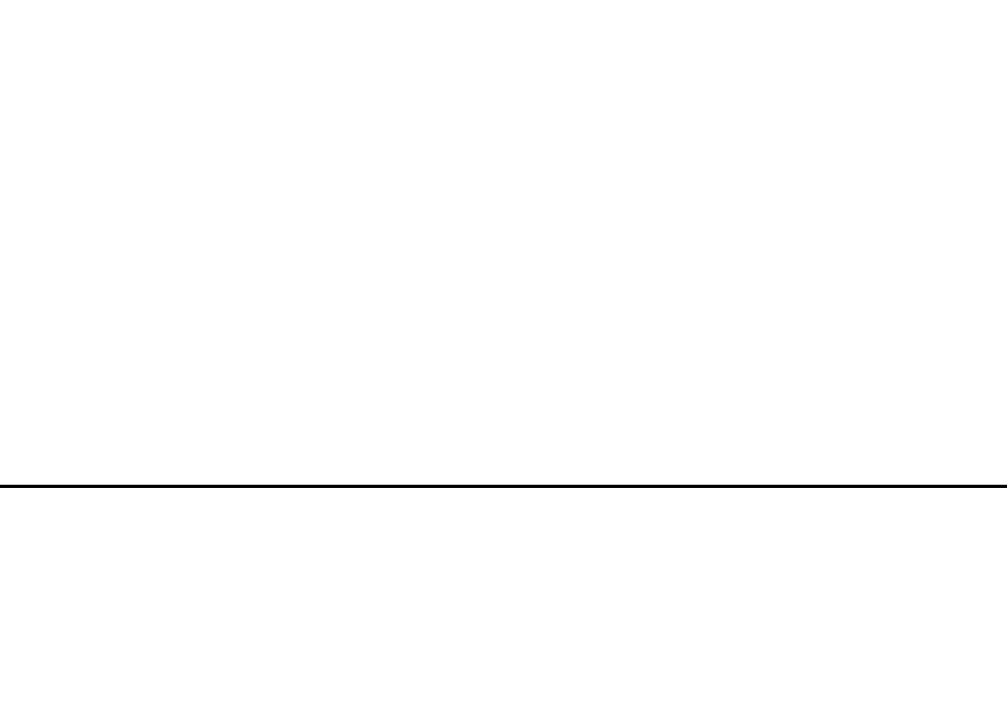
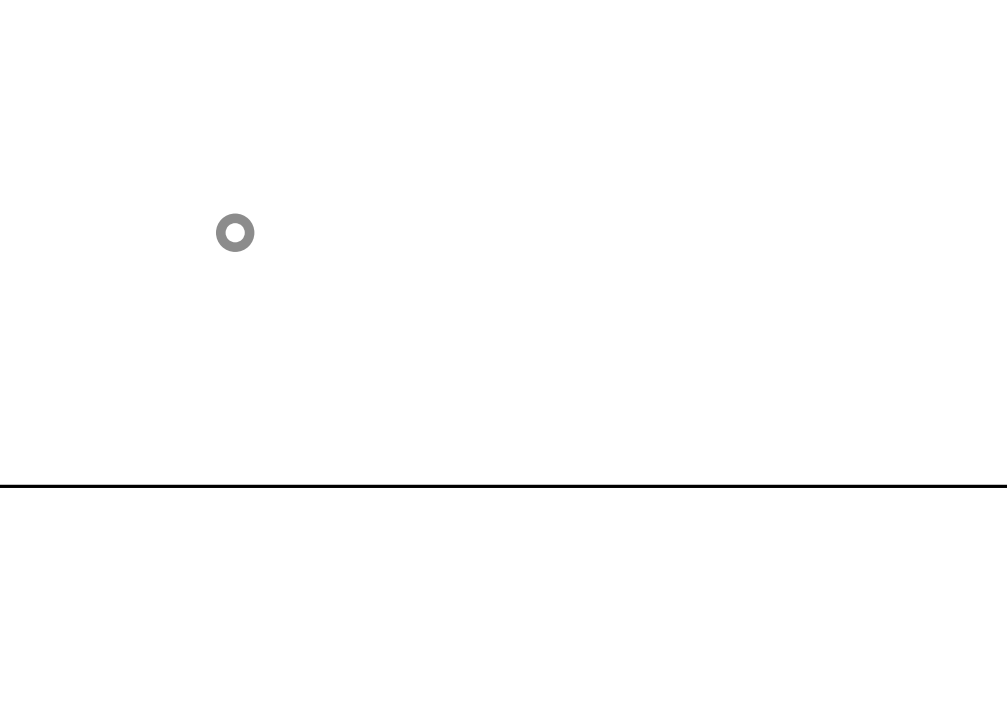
via: none -> (235, 232)

